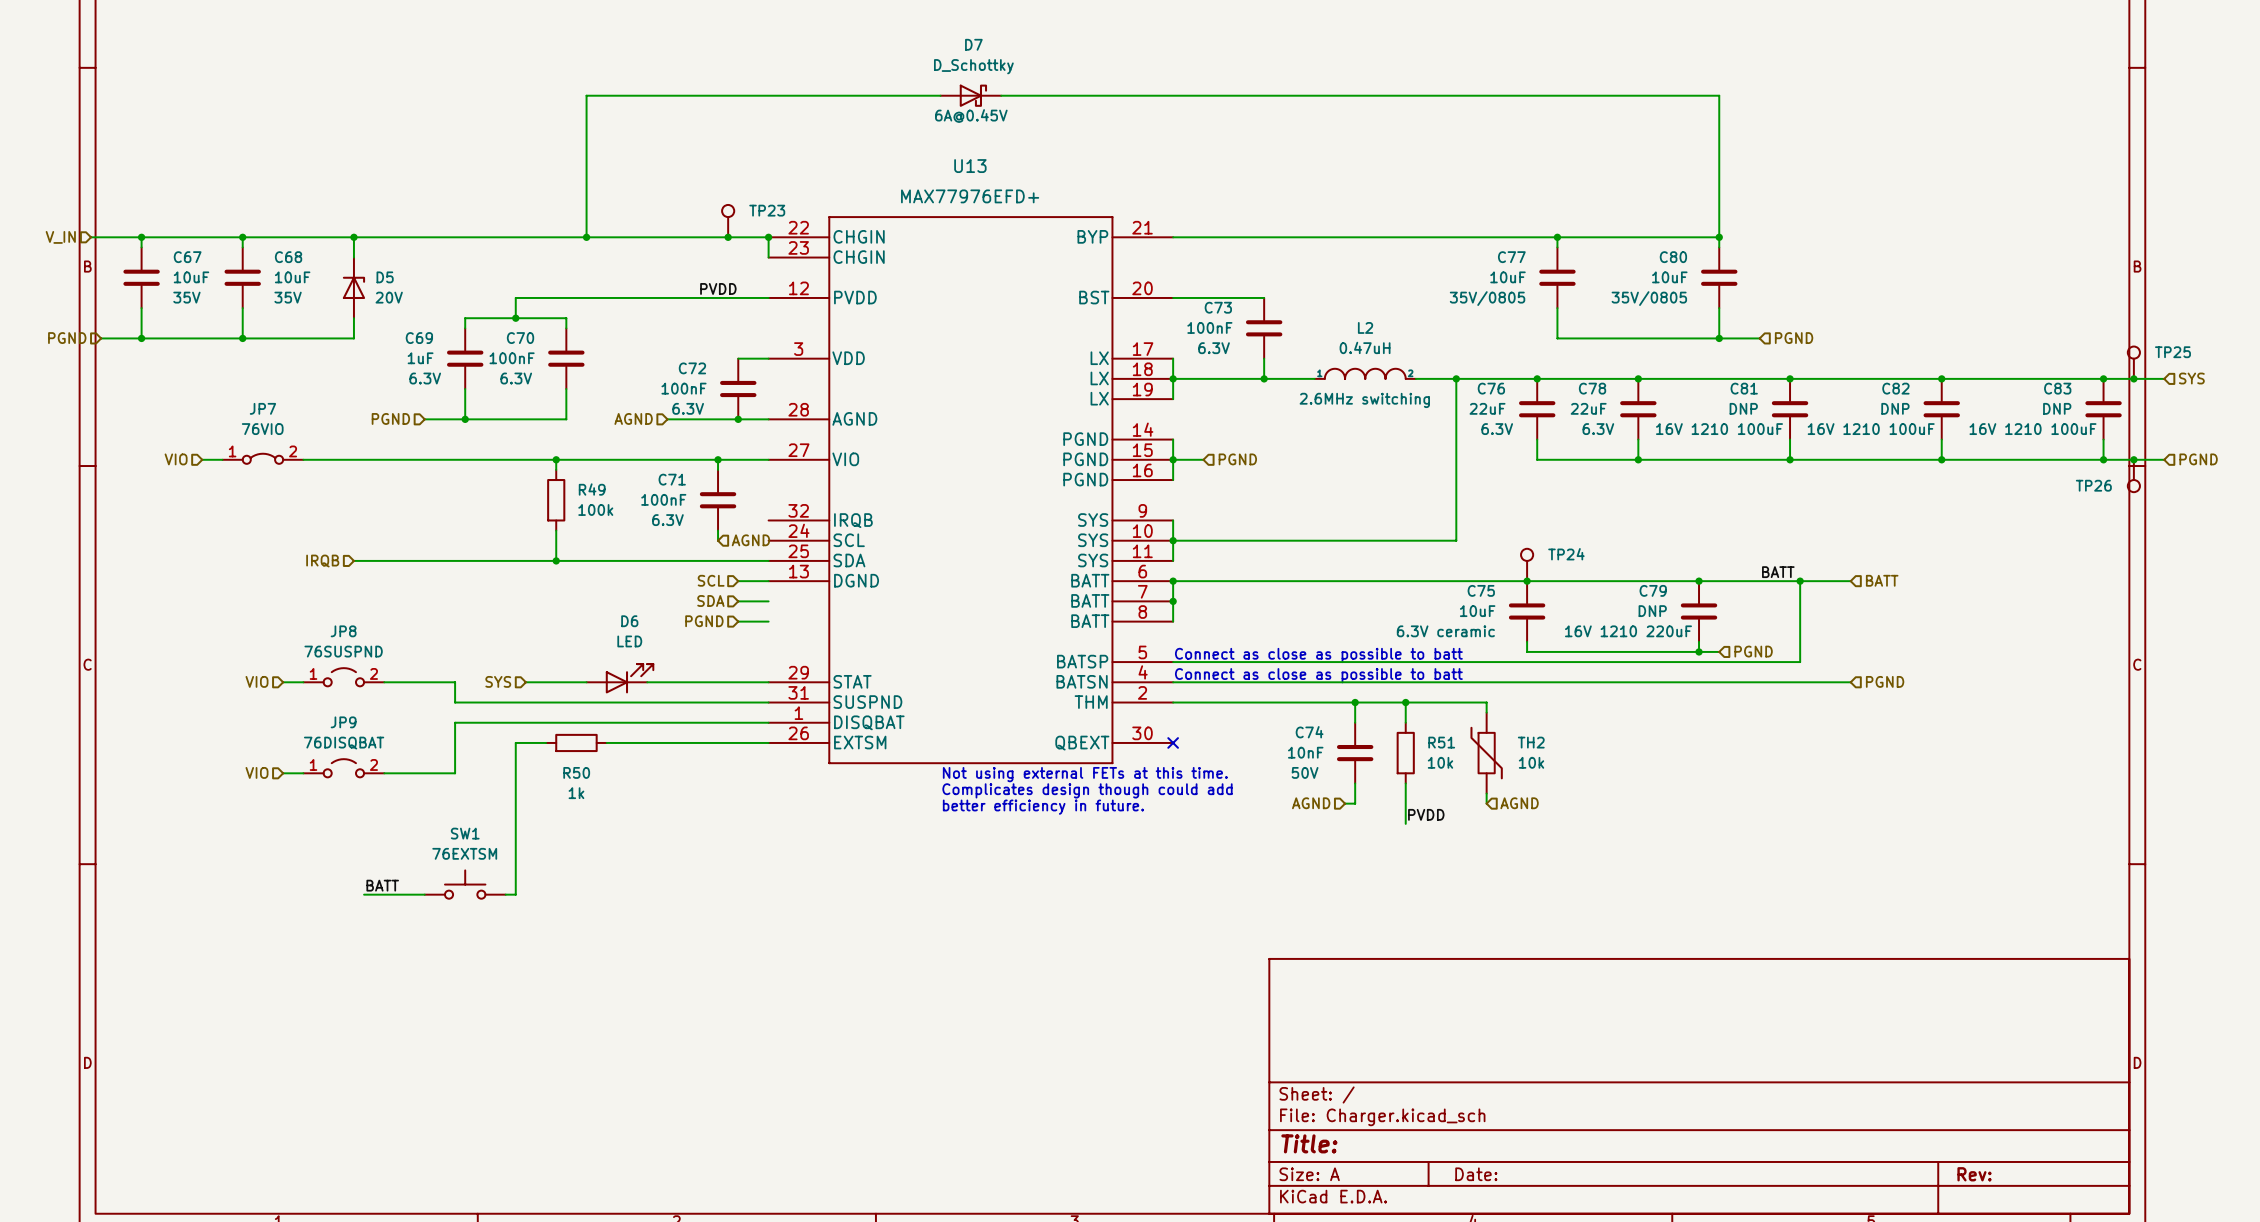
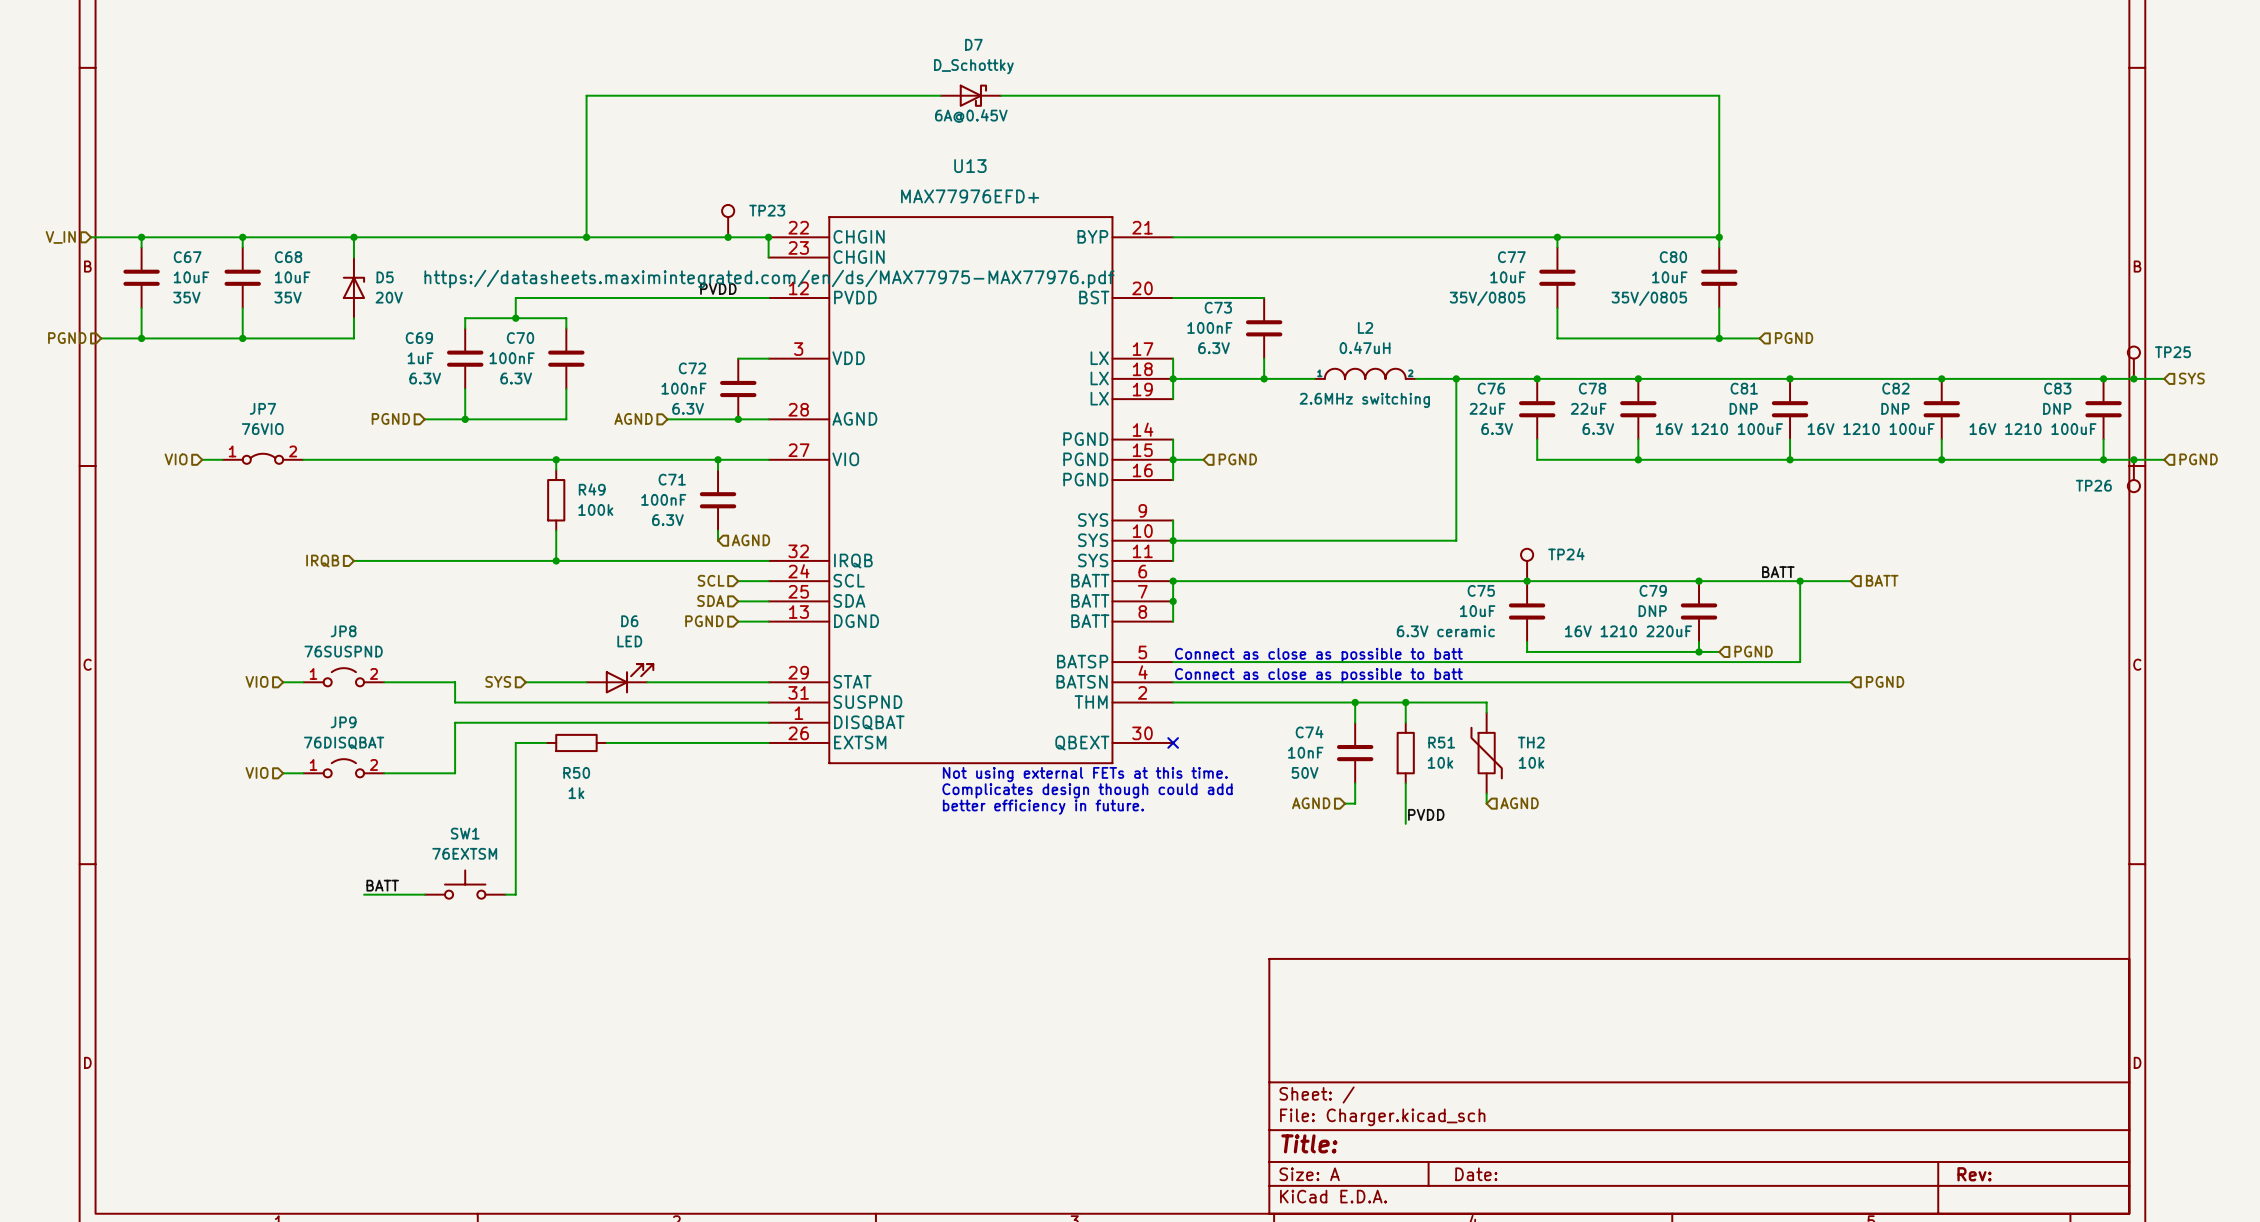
U13 symbol: [768, 216, 1174, 764] -> [768, 216, 1174, 764]
U13 text: none -> https://datasheets.maximintegrated.com/en/ds/MAX77975-MAX77976.pdf (769, 279)

